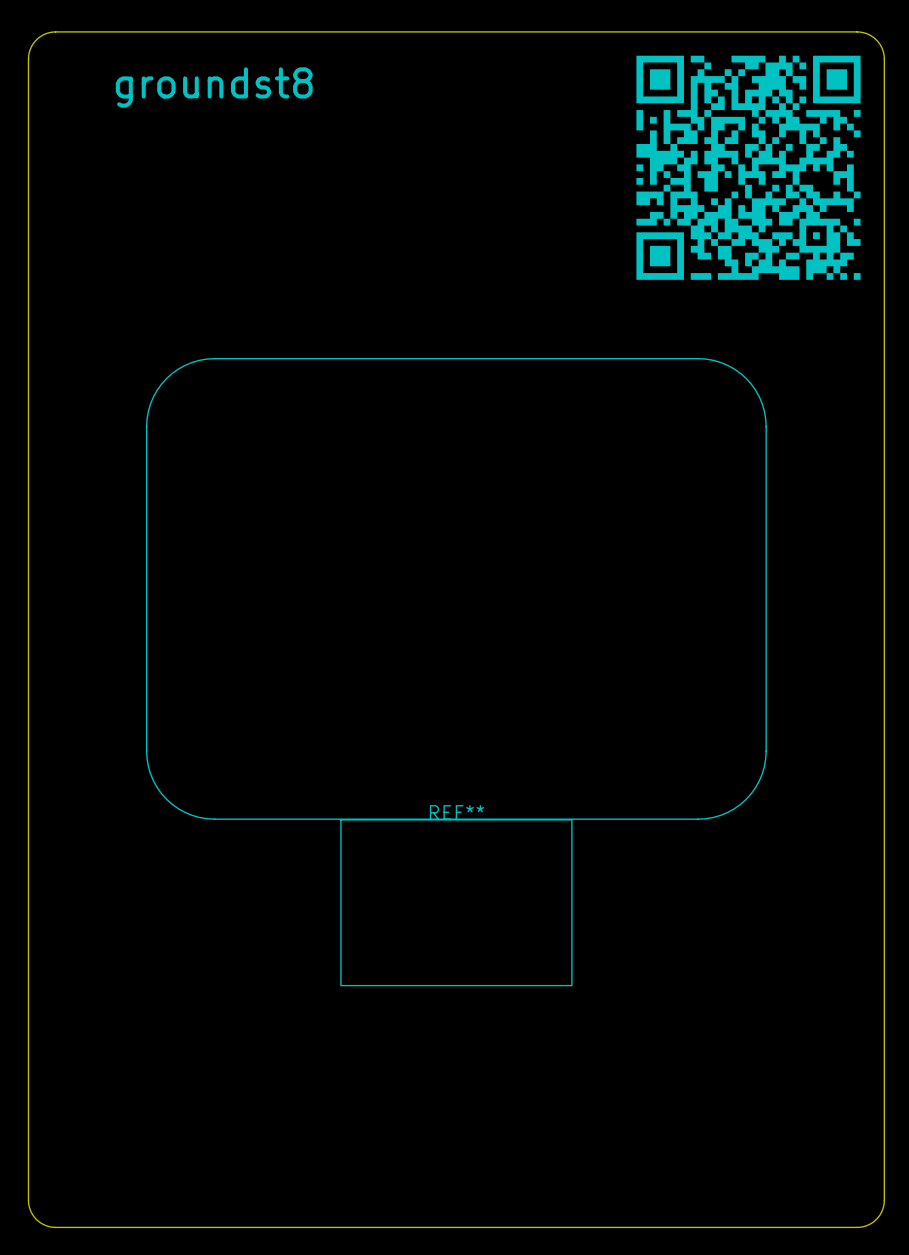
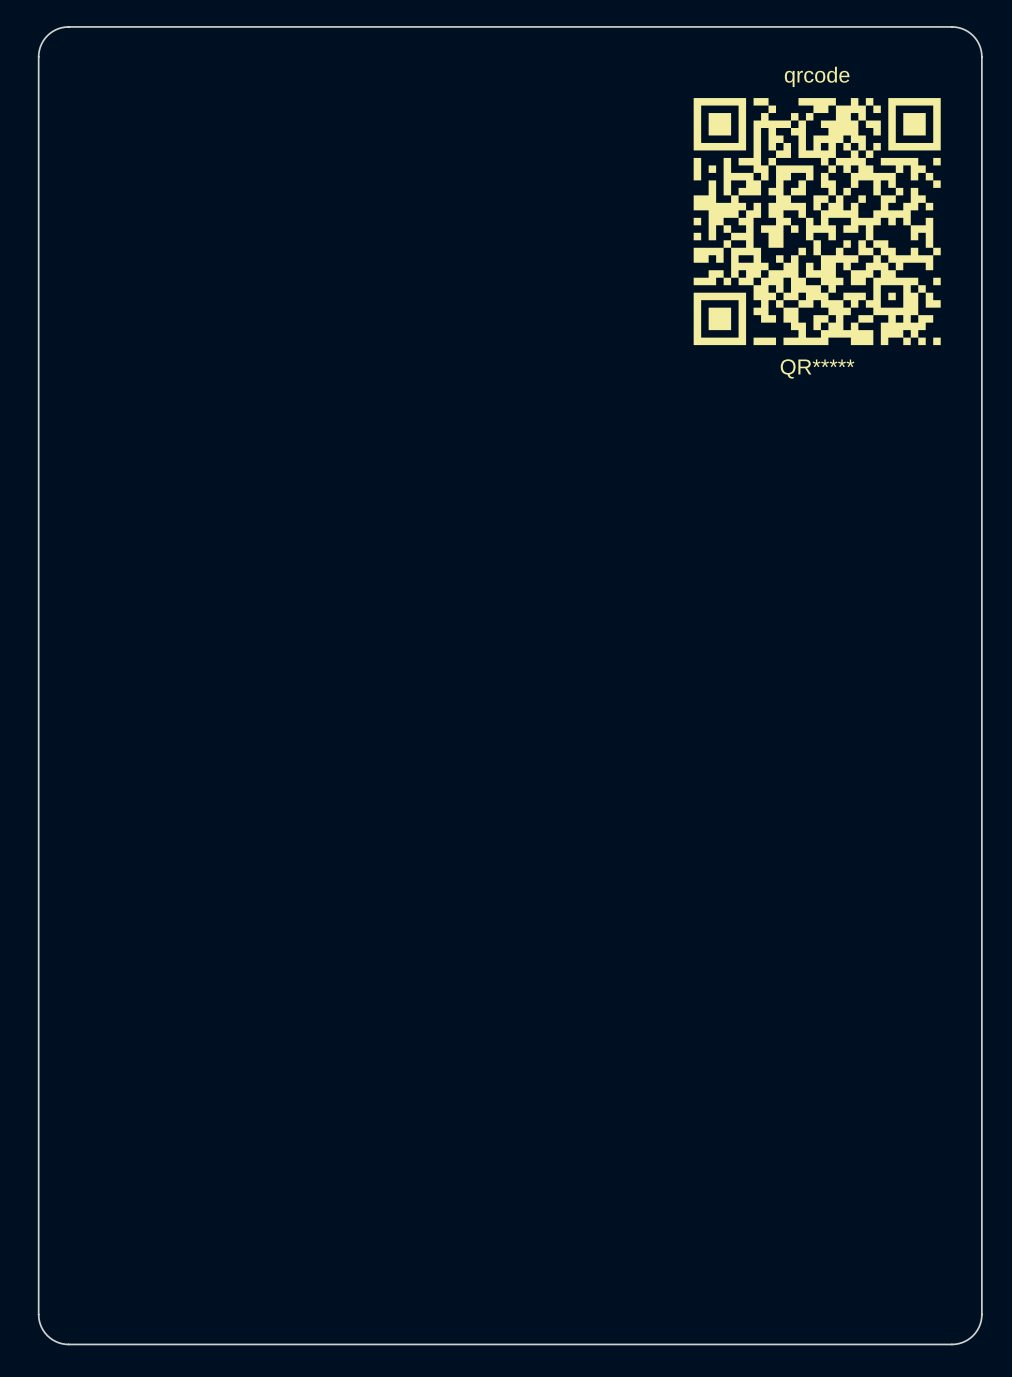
drawing: [636, 55, 861, 280] -> none
text: groundst8 (214, 87) -> none
QR*****: none -> qrcode (817, 221)
REF**: (456, 672) -> none

